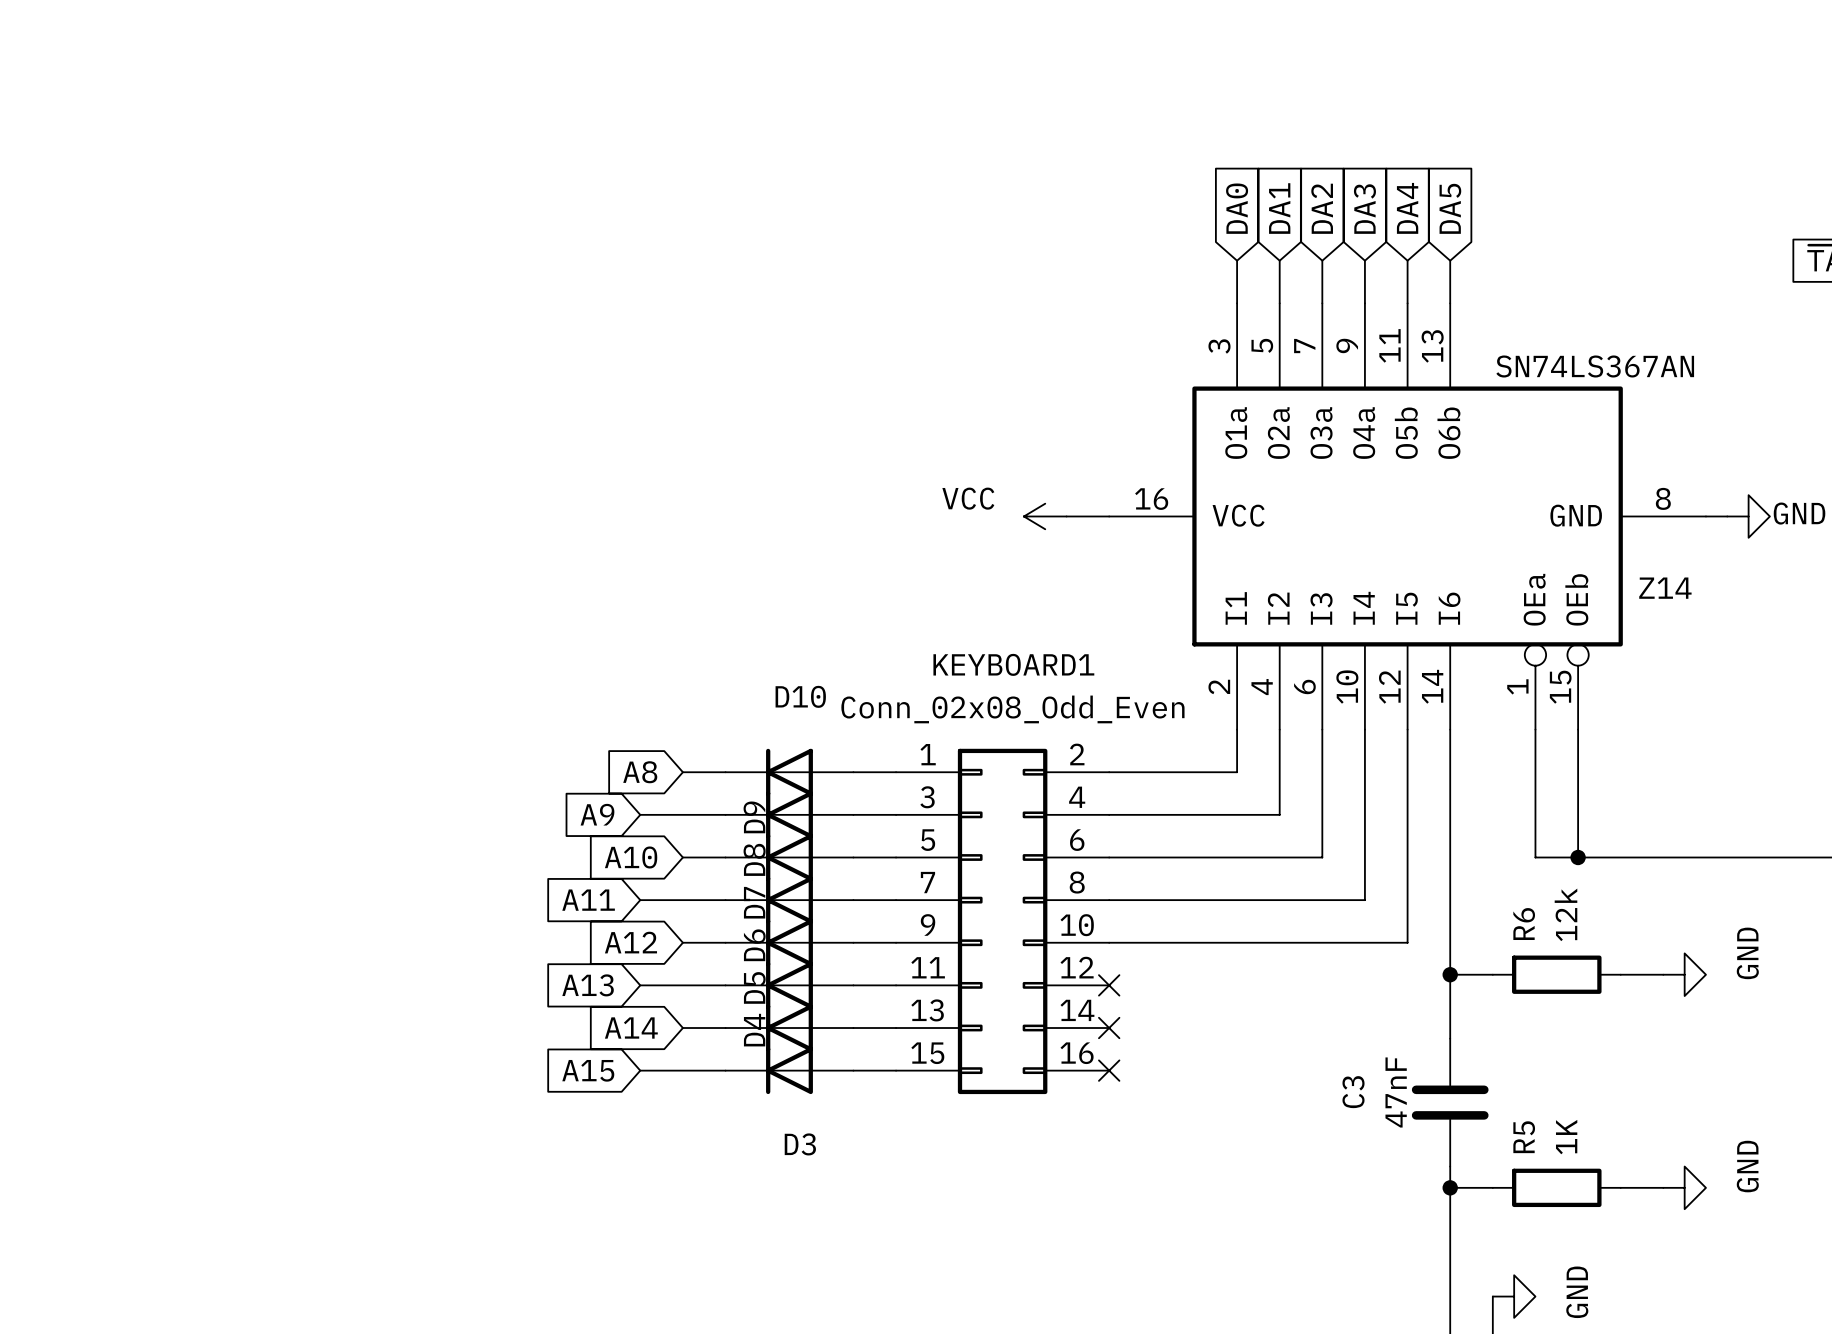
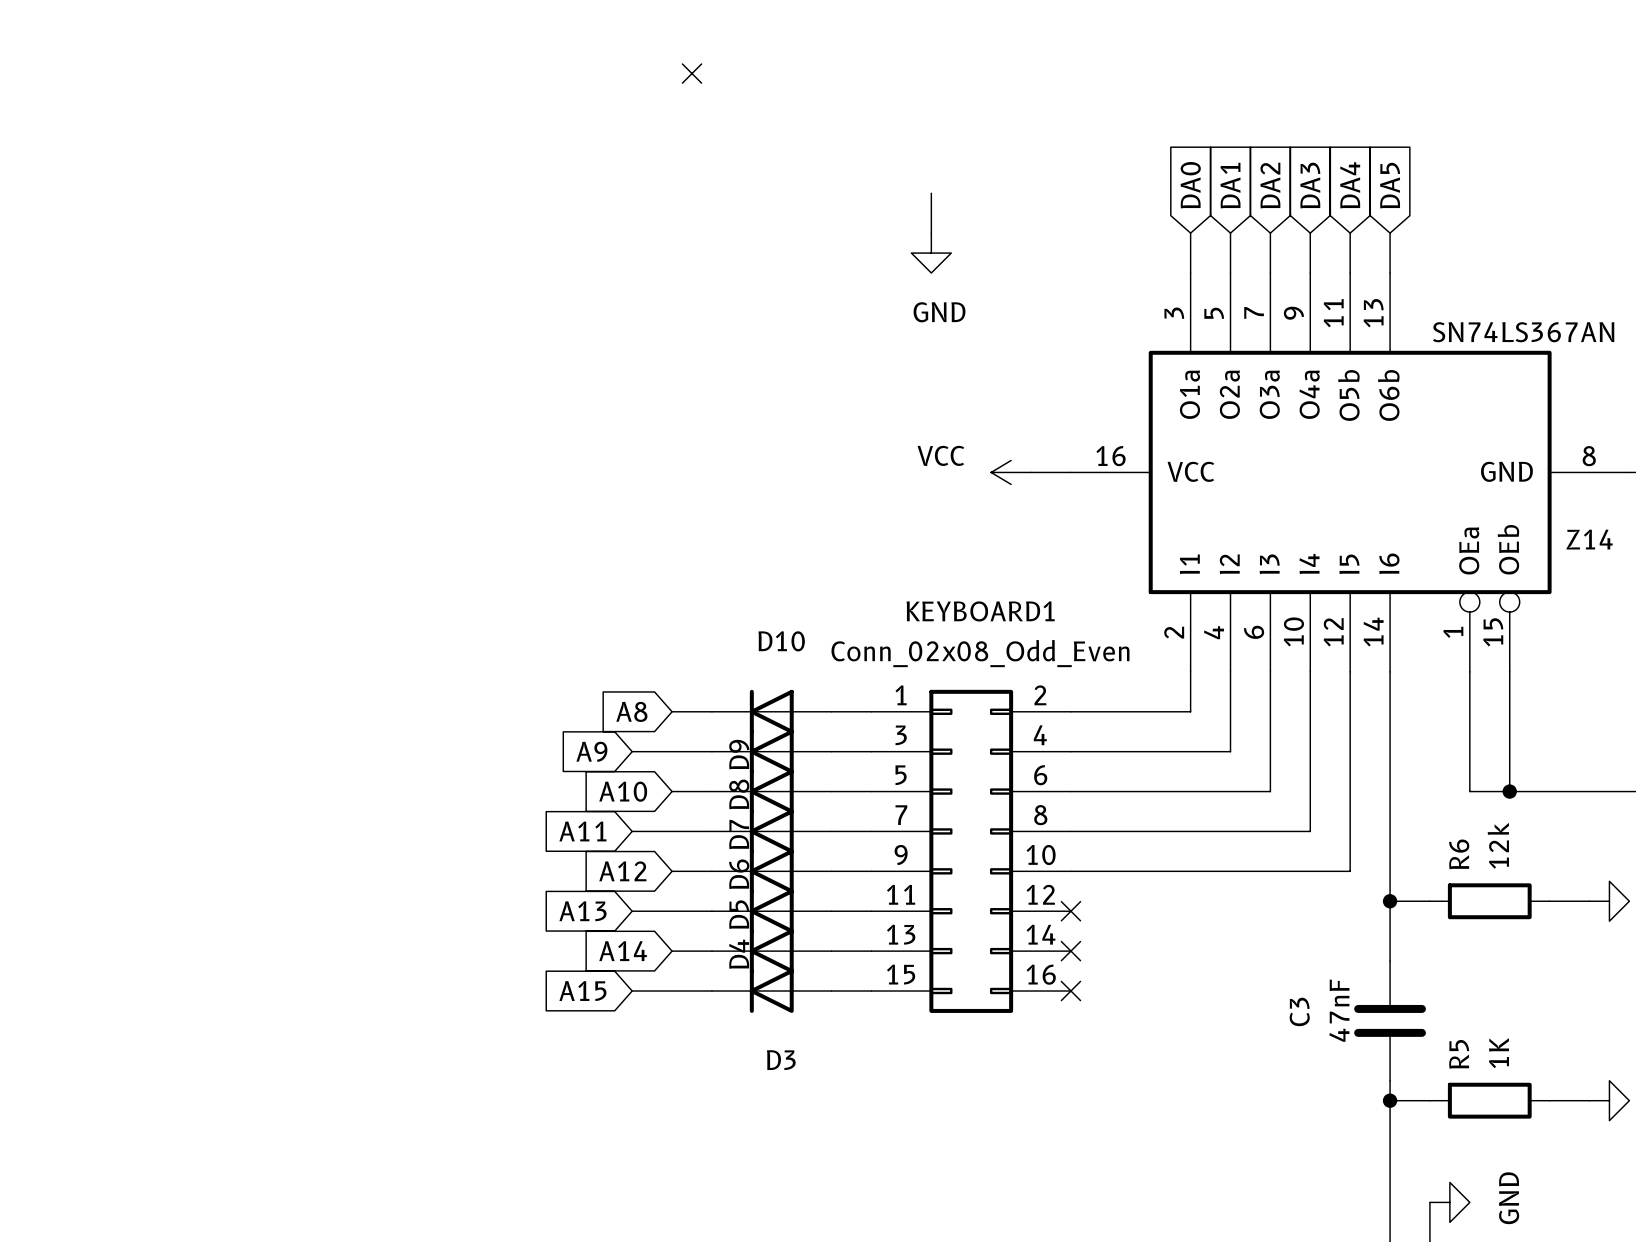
no-connect mark: none -> (692, 73)
wire: none -> (931, 193) (931, 233)
power symbol: none -> GND (931, 253)

